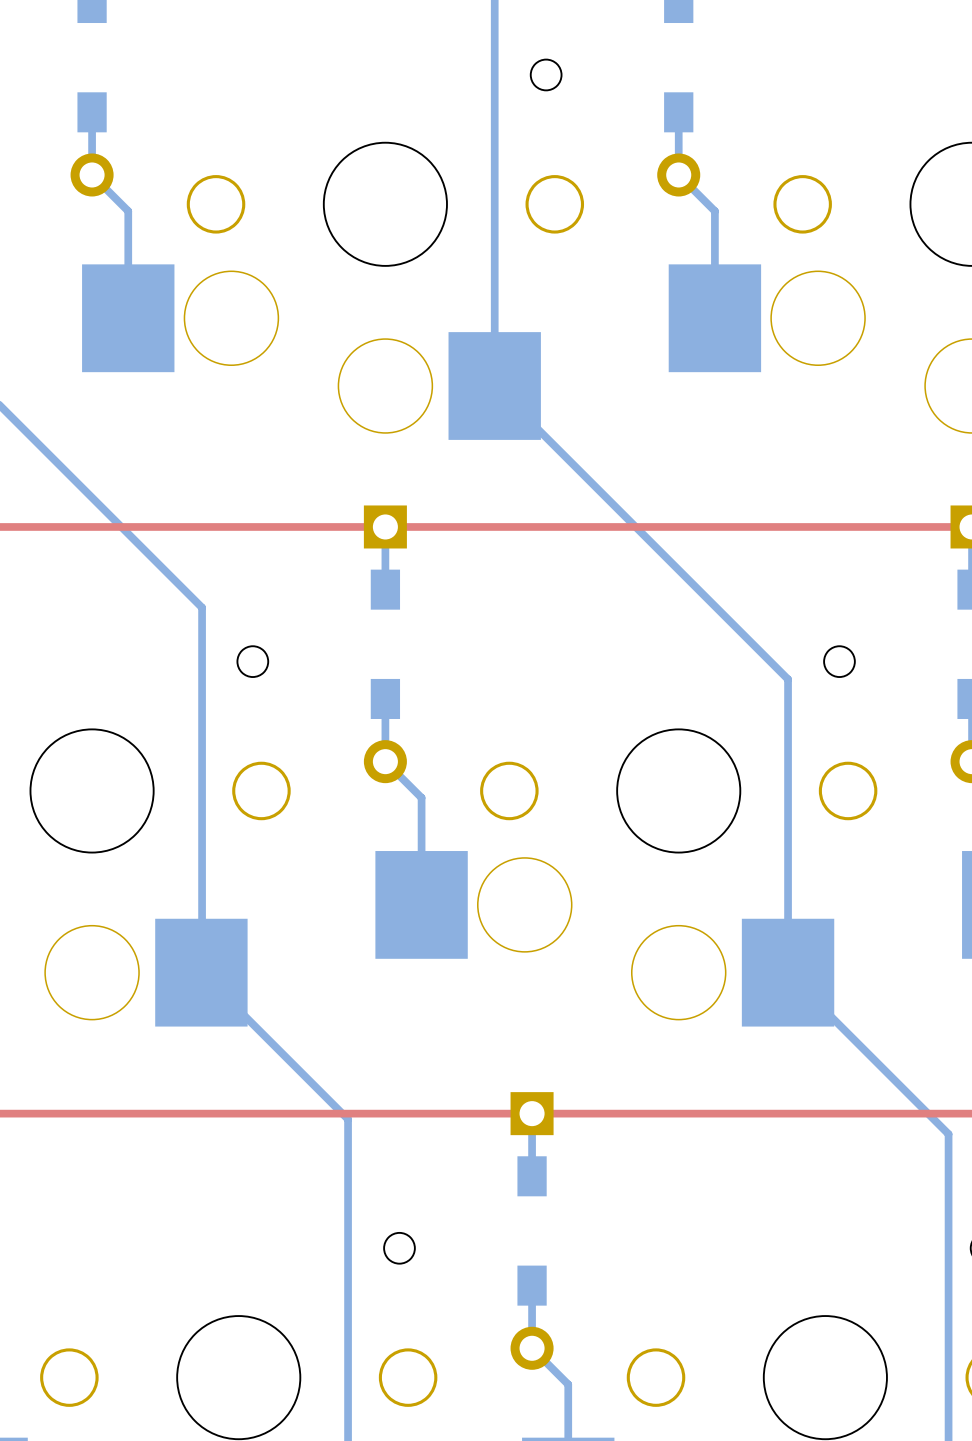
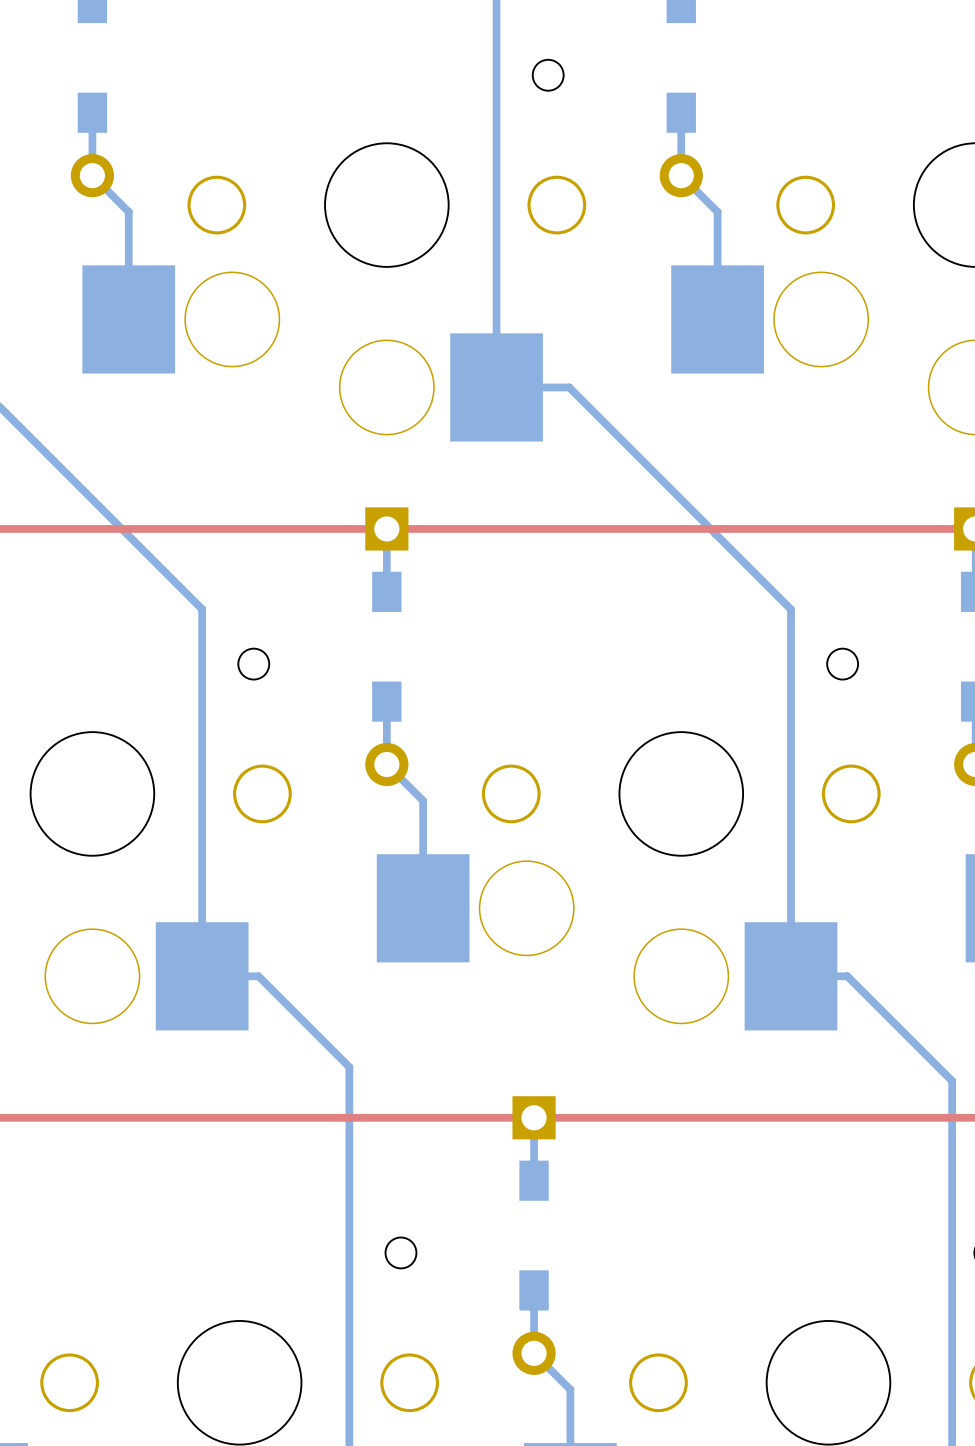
bottom track: (494, 386) (788, 679) -> (496, 387) (569, 387) (715, 533)
bottom track: none -> (715, 533) (791, 609) (791, 681)
bottom track: (201, 606) (201, 972) (348, 1119) -> (202, 609) (202, 976) (258, 976) (349, 1067) (349, 1123)
bottom track: (788, 972) (948, 1134) -> (791, 976) (847, 976) (952, 1080) (952, 1138)

